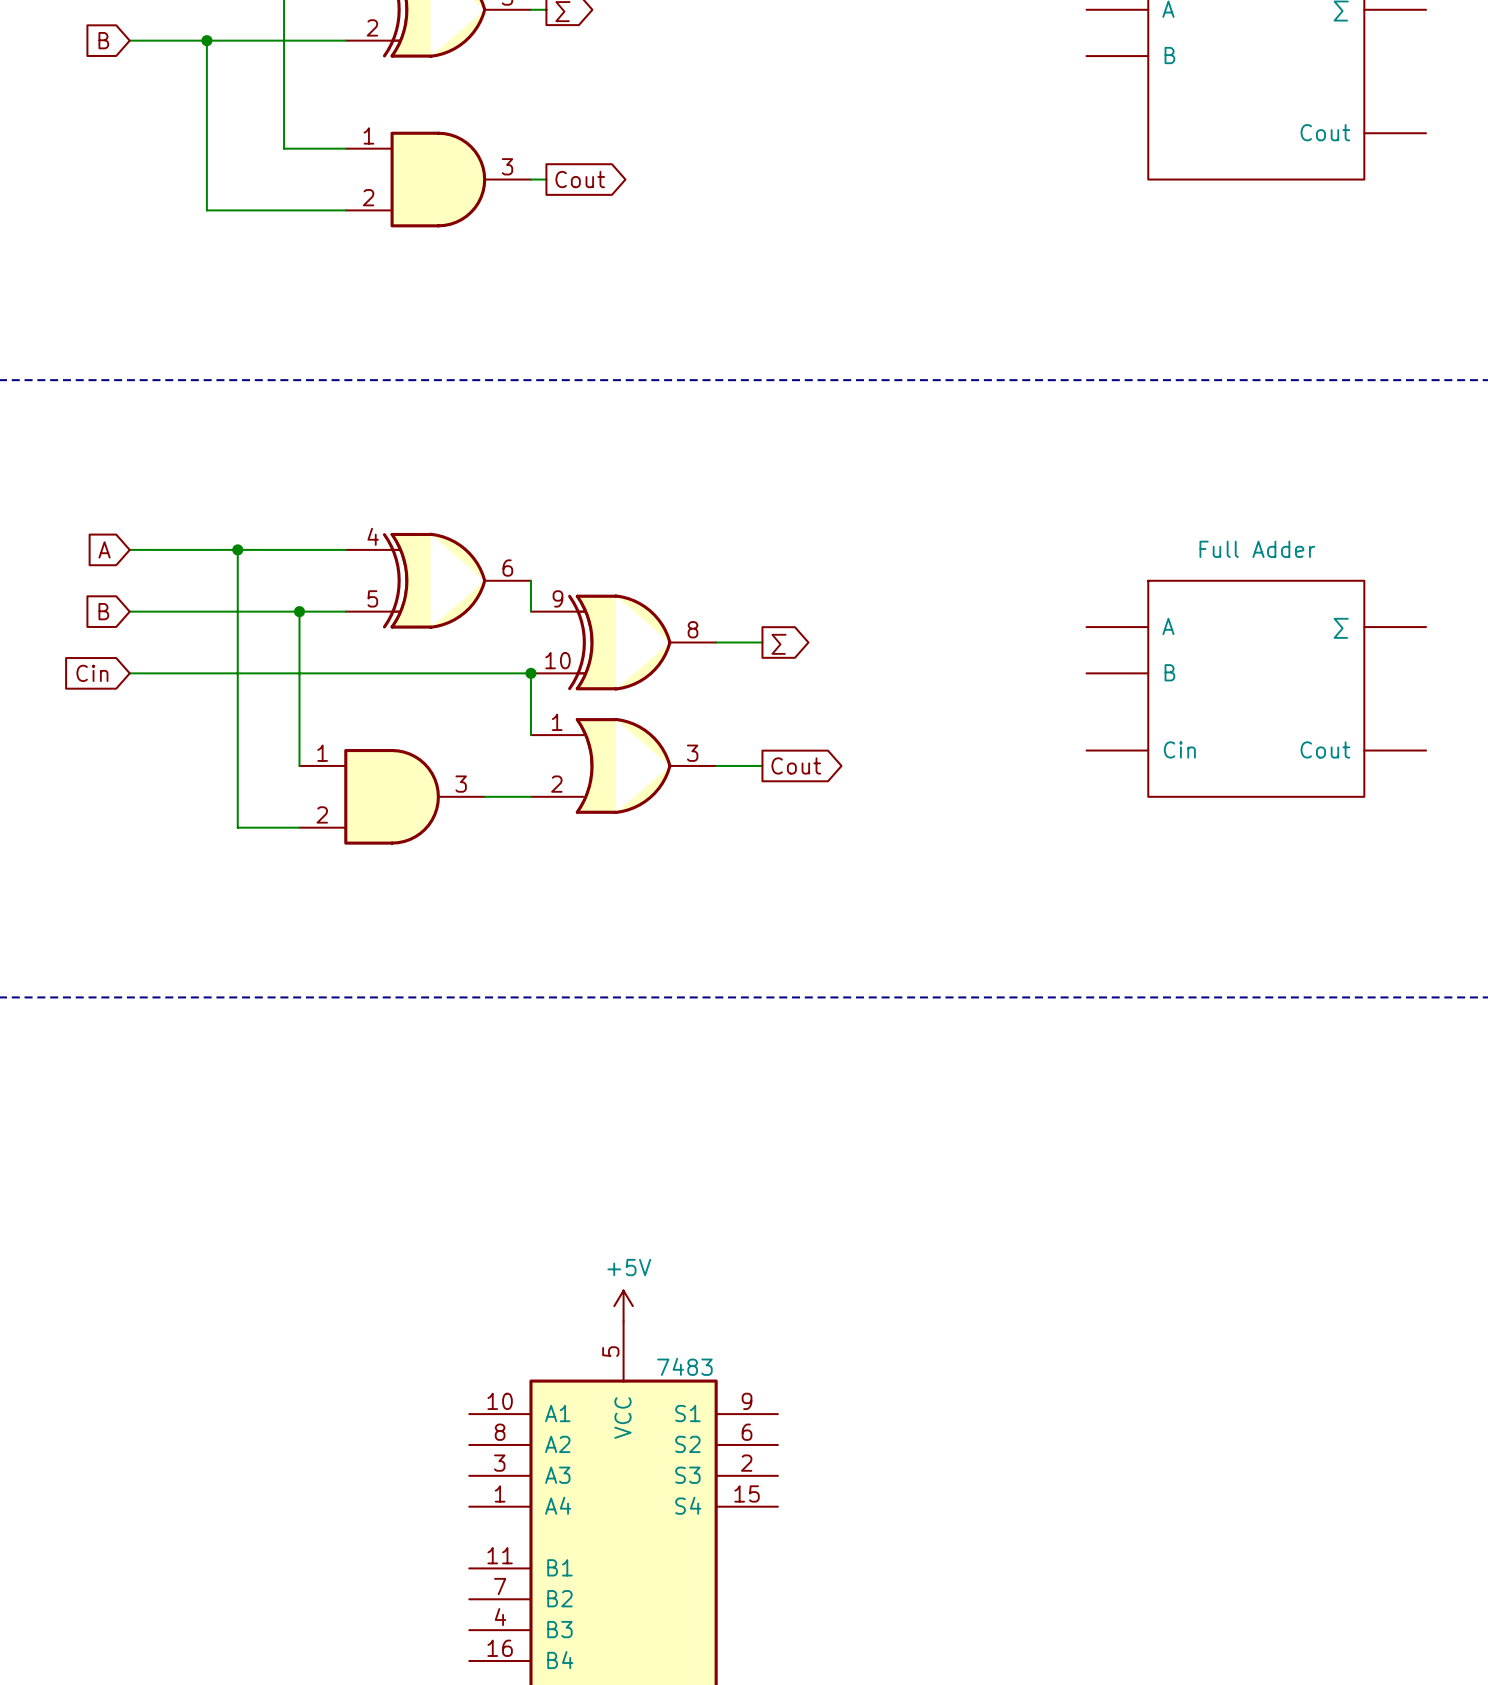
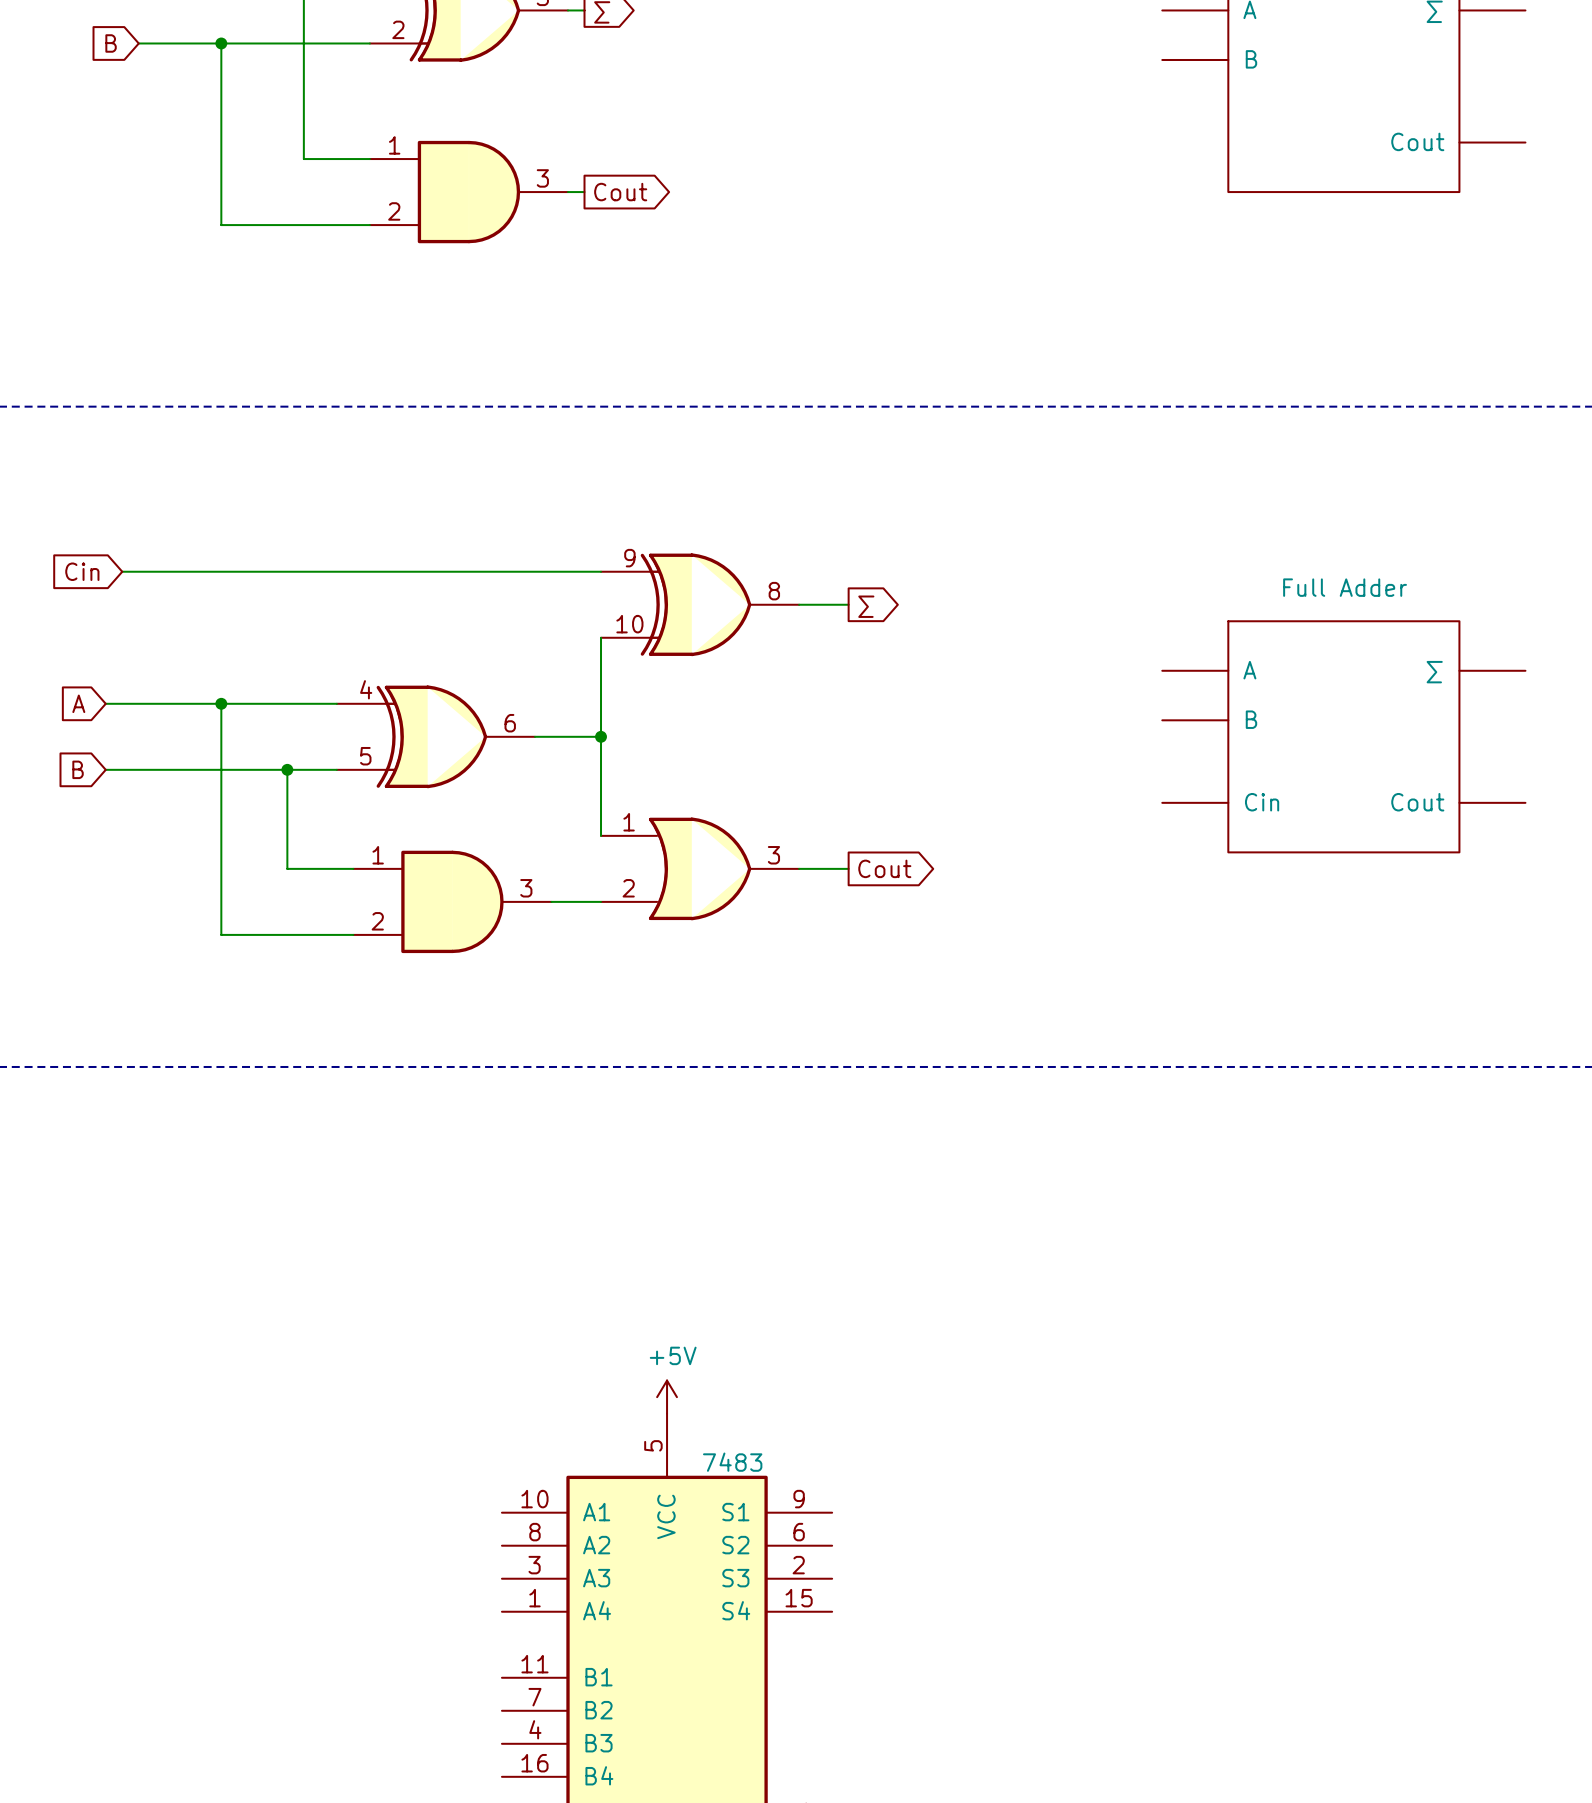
wire: none -> (122, 571) (601, 571)
global label position: A (104, 549) -> A (78, 703)
wire: (129, 549) (345, 549) -> (105, 703) (336, 703)
wire: (237, 549) (237, 827) (299, 827) -> none
junction: (237, 549) -> none
part position: (438, 580) -> (435, 736)
wire: (530, 580) (530, 611) -> none
wire: none -> (601, 637) (601, 835)
global label position: B (103, 611) -> B (78, 769)
wire: (129, 611) (345, 611) -> (105, 769) (336, 769)
wire: (299, 611) (299, 765) -> none
junction: (299, 611) -> none
part position: (623, 642) -> (700, 604)
wire: (716, 642) (762, 642) -> (799, 604) (848, 604)
global label position: ∑ (779, 644) -> ∑ (866, 606)
wire: none -> (221, 703) (221, 934) (353, 934)
junction: none -> (221, 703)
global label position: Cin (92, 673) -> Cin (82, 571)
wire: (129, 673) (530, 673) (530, 735) -> none
junction position: (530, 673) -> (601, 736)
wire: none -> (534, 736) (601, 736)
wire: none -> (287, 769) (287, 868) (353, 868)
junction: none -> (287, 769)
part position: (623, 765) -> (700, 868)
wire: (716, 765) (762, 765) -> (799, 868) (848, 868)
global label position: Cout (796, 765) -> Cout (884, 868)
part position: (392, 796) -> (452, 901)
wire: (484, 796) (530, 796) -> (551, 901) (601, 901)

